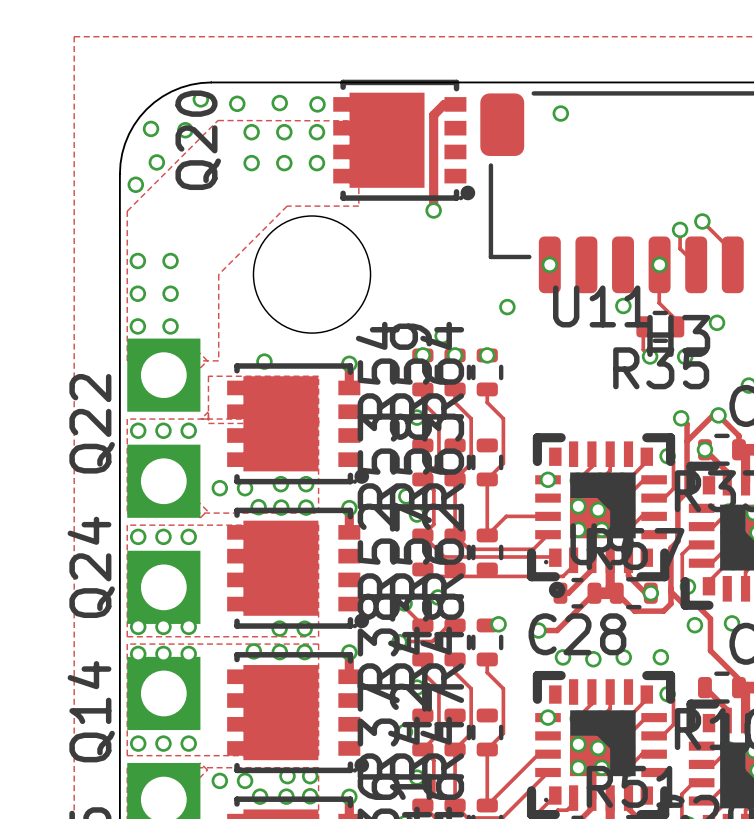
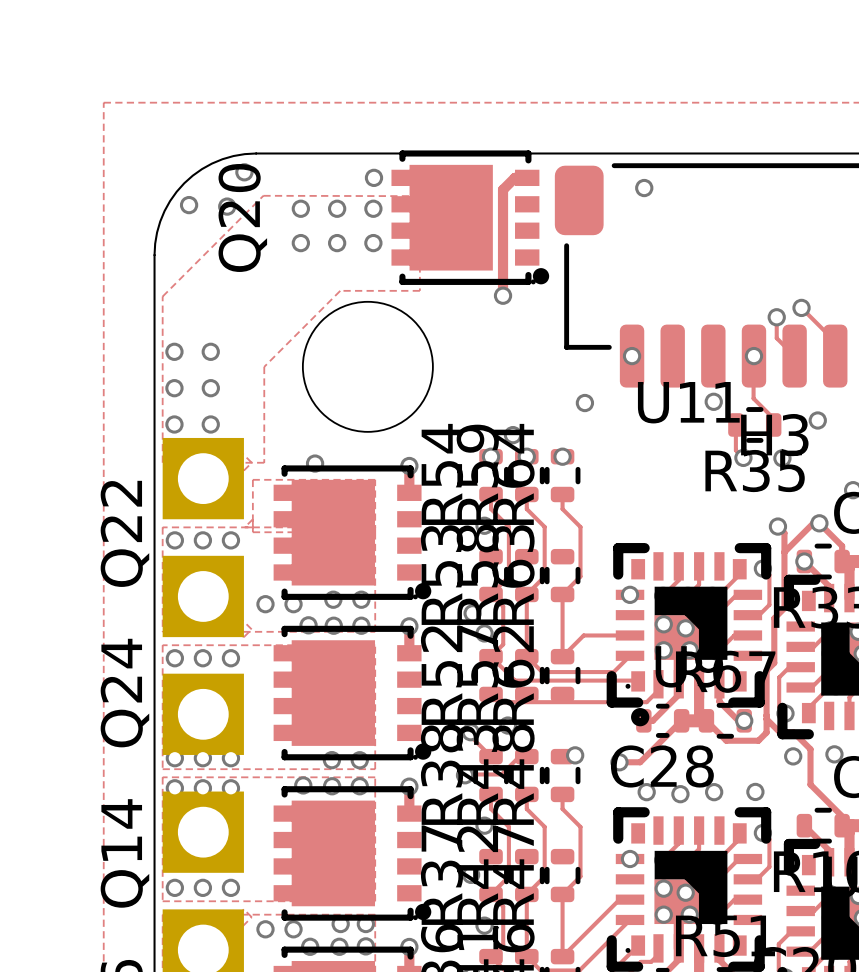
via: (237, 103) -> none
via: (279, 103) -> none
via: (156, 162) -> none
via: (135, 184) -> none

